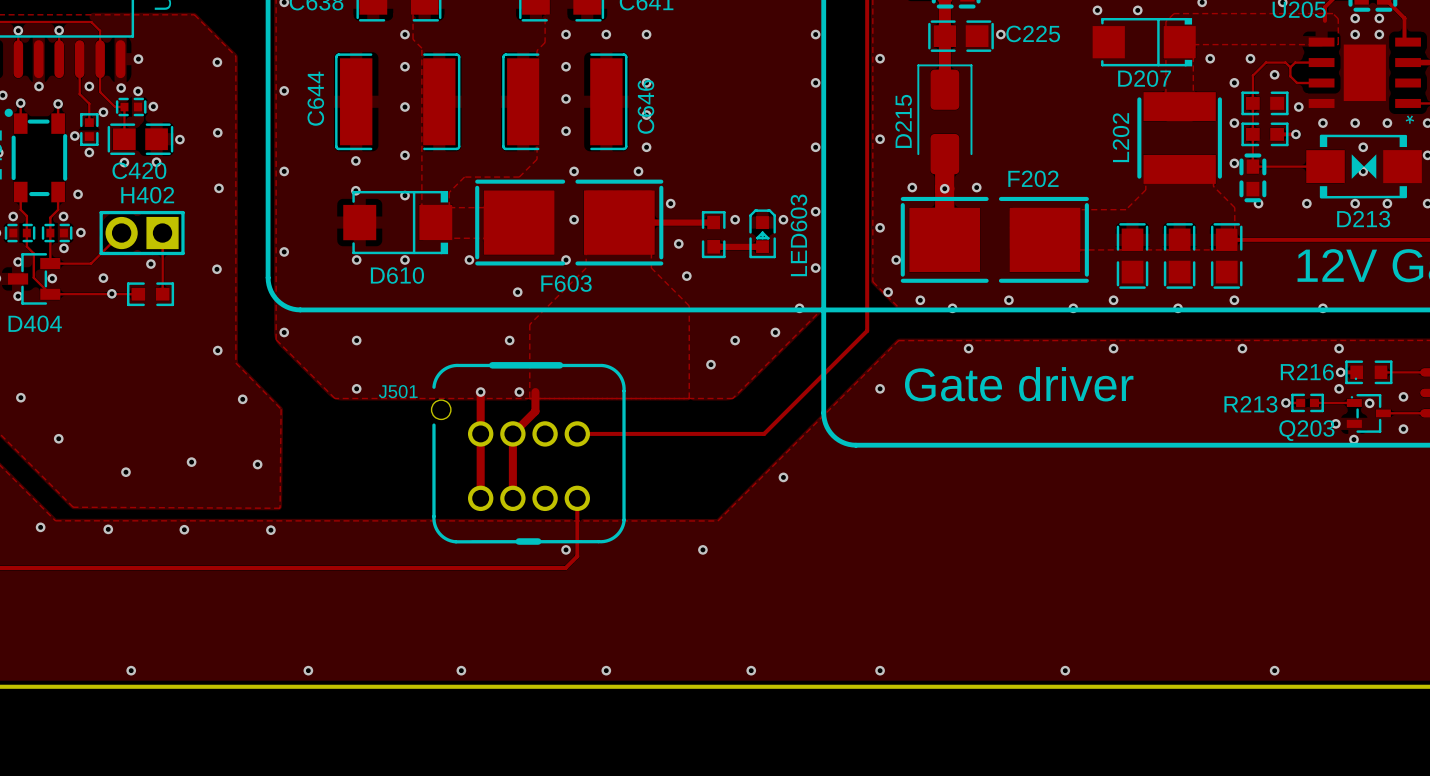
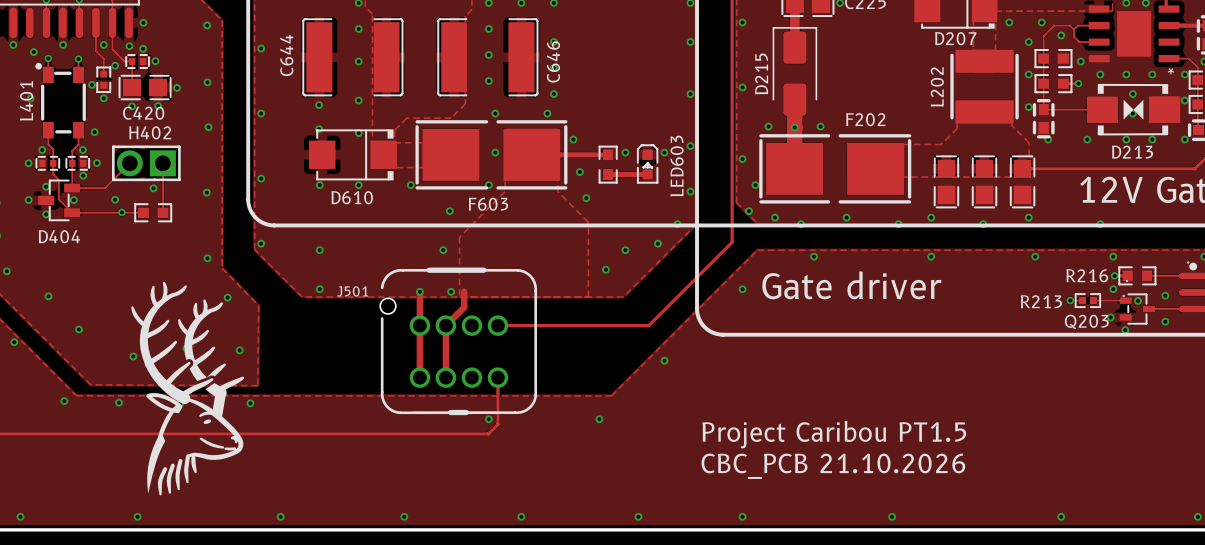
drawing: none -> [131, 281, 245, 496]
text: none -> Project Caribou PT1.5 (834, 434)
text: none -> CBC_PCB 21.10.2026 (833, 466)

